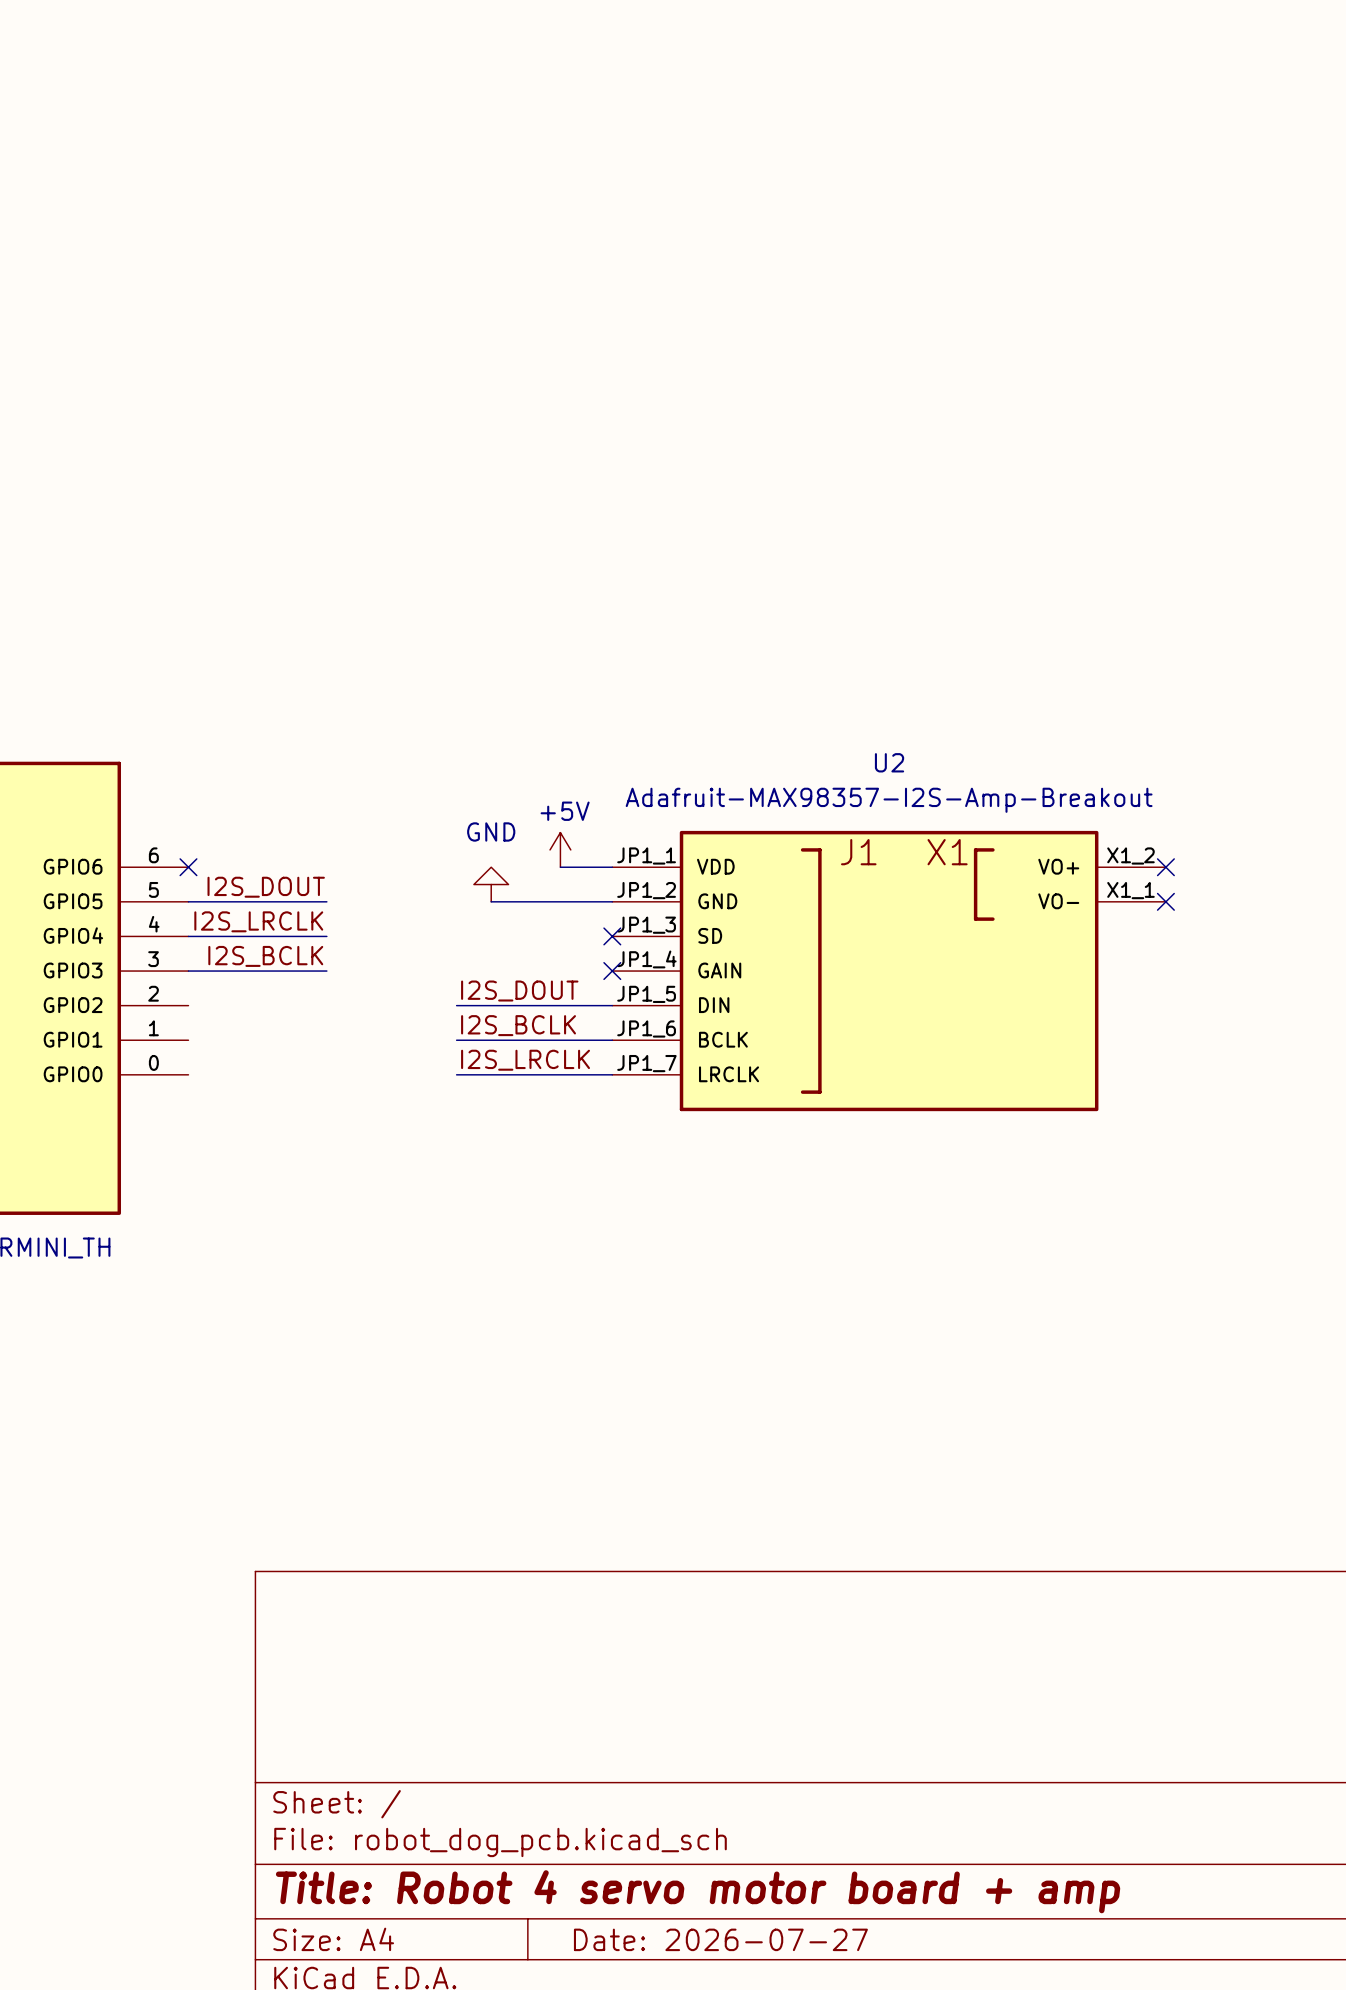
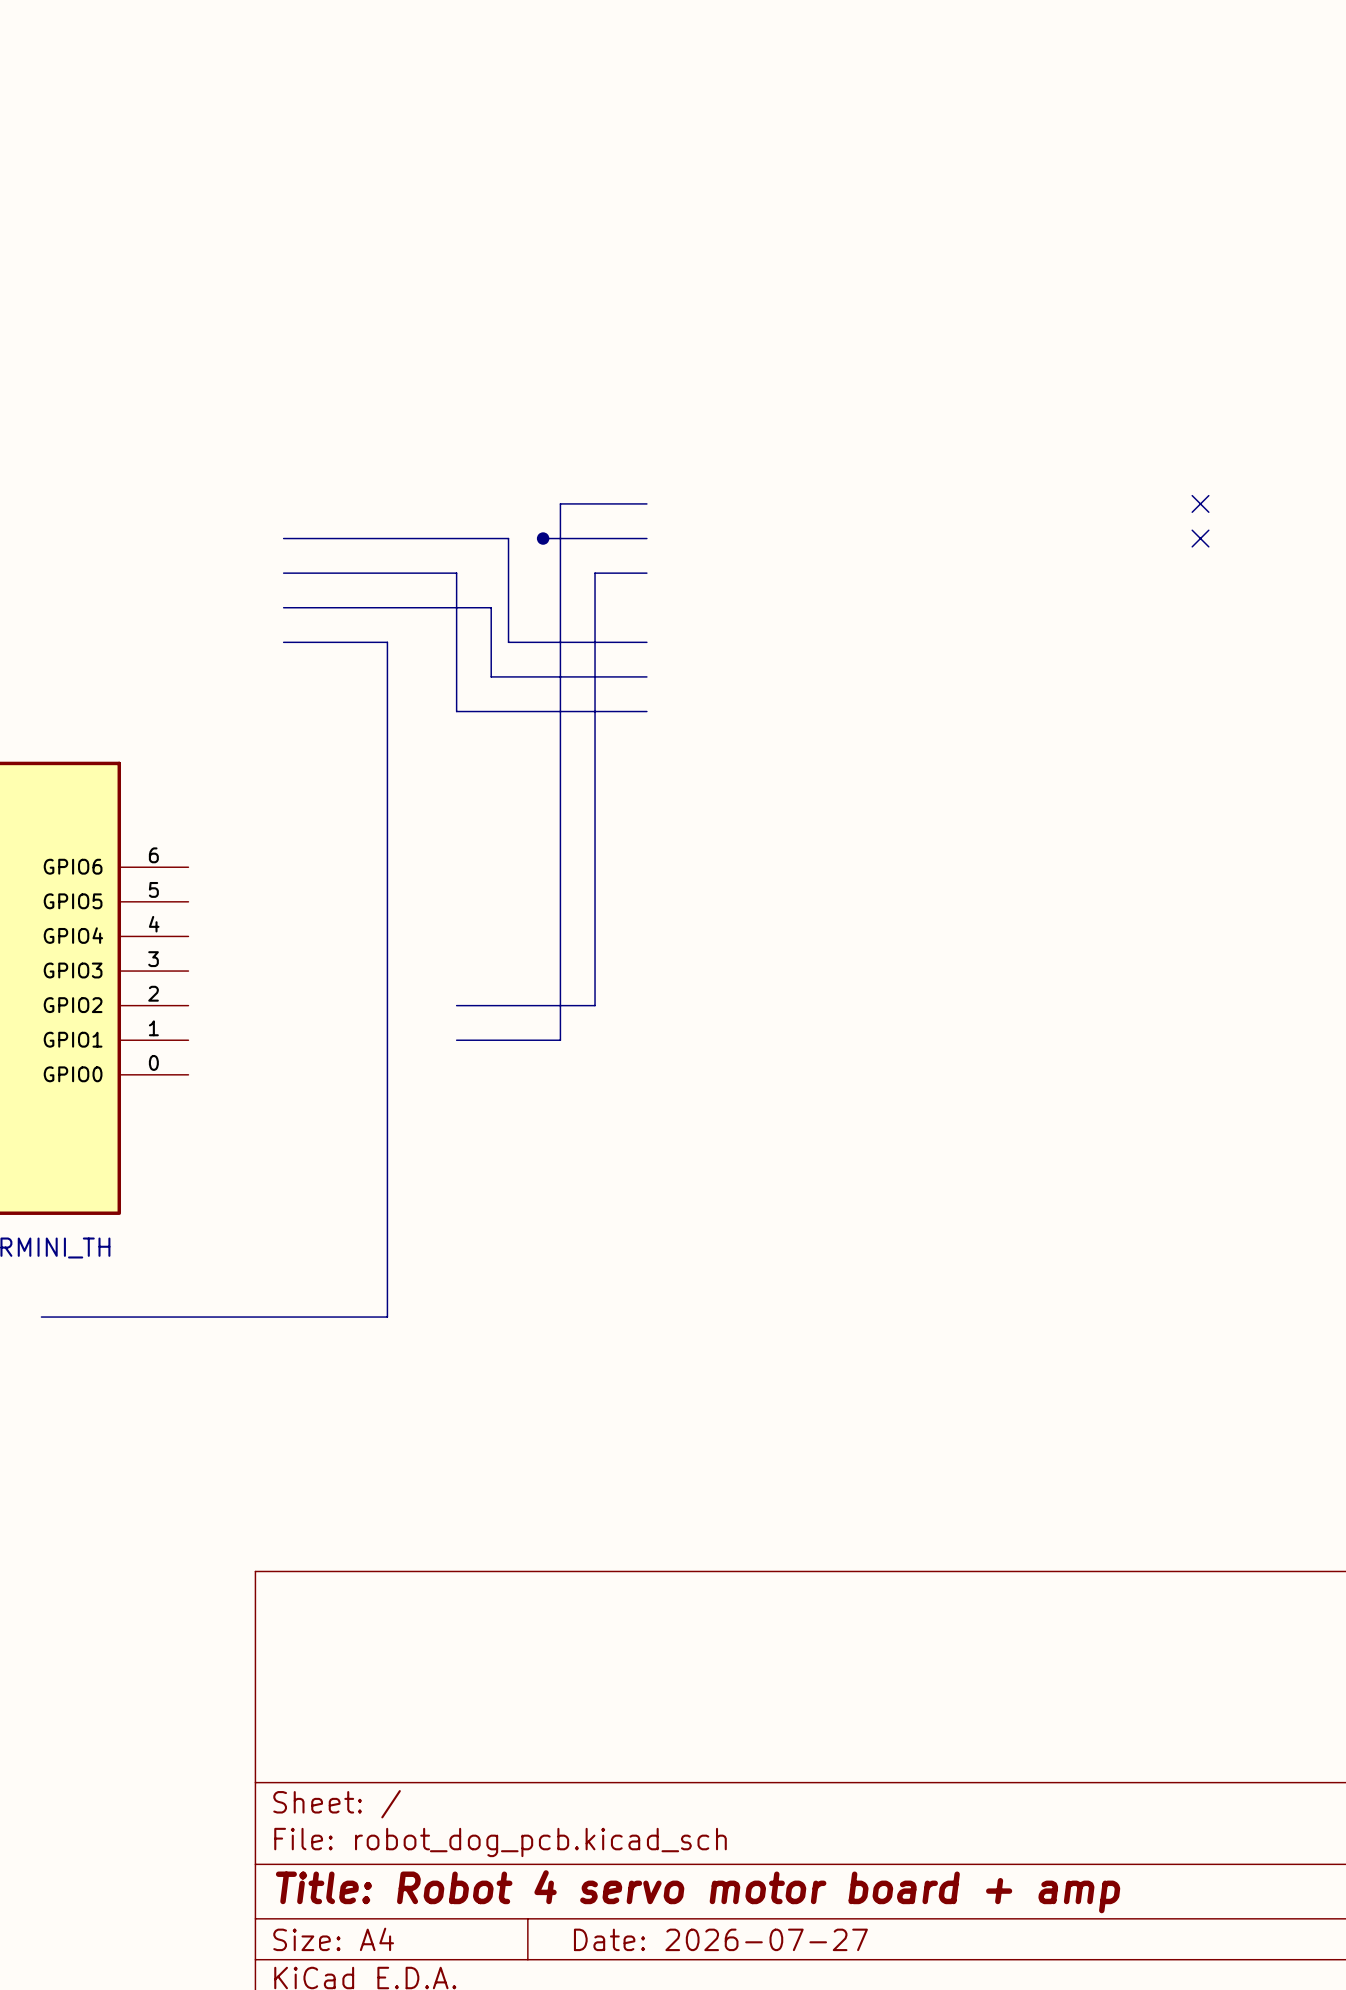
no-connect mark: none -> (1200, 503)
wire: none -> (283, 538) (508, 538) (508, 642) (646, 642)
wire: none -> (543, 538) (646, 538)
junction: none -> (543, 538)
no-connect mark: none -> (1200, 538)
wire: none -> (283, 573) (456, 573) (456, 711) (646, 711)
wire: none -> (283, 607) (491, 607) (491, 676) (646, 676)
wire: none -> (283, 642) (387, 642) (387, 1317) (41, 1317)
power symbol: +5V (560, 849) -> none
no-connect mark: (188, 867) -> none
wire: (560, 867) (612, 867) -> none
no-connect mark: (1165, 867) -> none
power symbol: GND (491, 884) -> none
label: I2S_DOUT (266, 887) -> none
wire: (188, 901) (326, 901) -> none
wire: (491, 901) (612, 901) -> none
no-connect mark: (1165, 901) -> none
label: I2S_LRCLK (258, 921) -> none
wire: (188, 936) (326, 936) -> none
no-connect mark: (612, 936) -> none
label: I2S_BCLK (265, 956) -> none
wire: (188, 971) (326, 971) -> none
no-connect mark: (612, 971) -> none
U2: Adafruit-MAX98357-I2S-Amp-Breakout (889, 971) -> none
label: I2S_DOUT (519, 991) -> none
wire: (595, 1005) (612, 1005) -> (595, 1005) (595, 573) (646, 573)
label: I2S_BCLK (518, 1025) -> none
wire: (560, 1040) (612, 1040) -> (560, 1040) (560, 503) (646, 503)
label: I2S_LRCLK (525, 1060) -> none
wire: (456, 1074) (612, 1074) -> none

